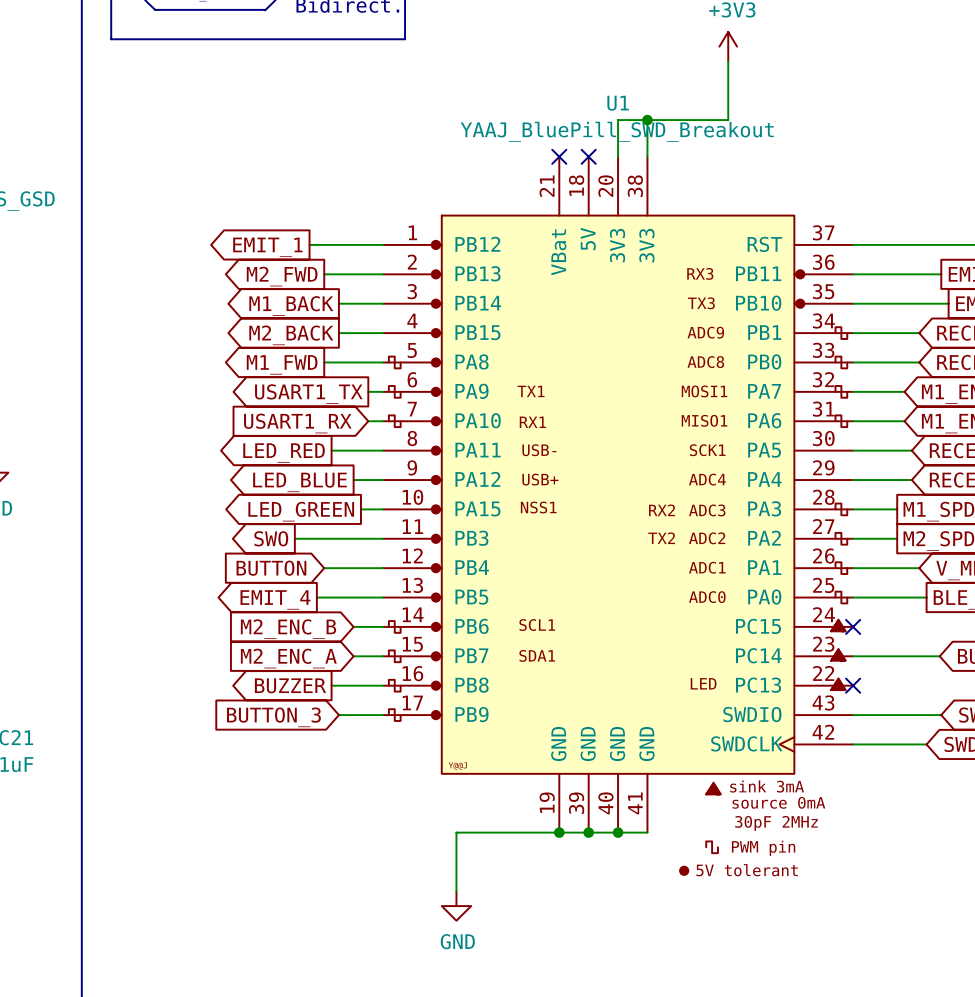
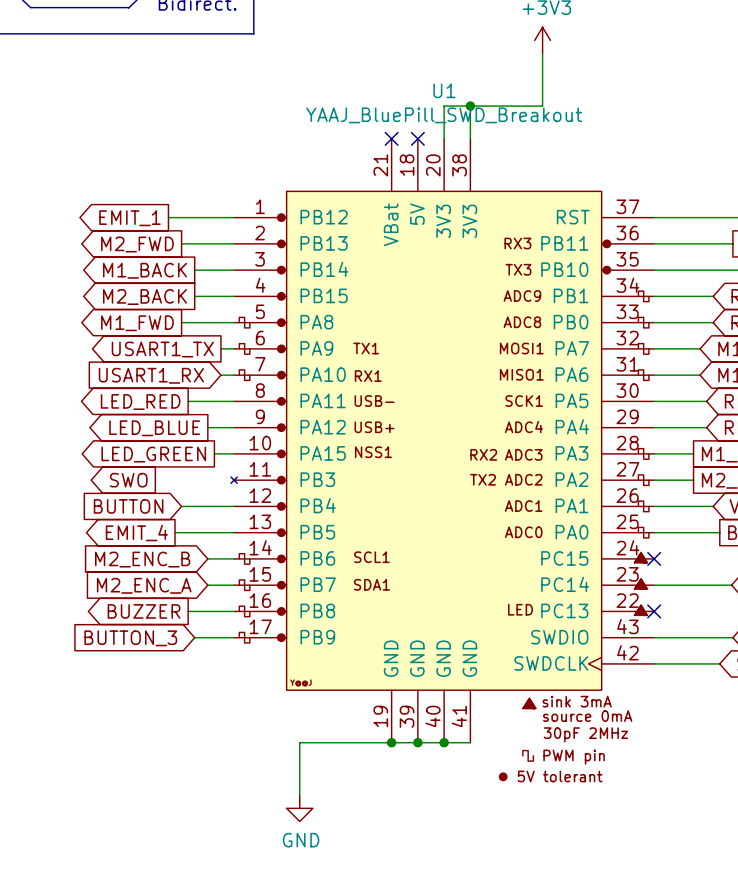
U1 symbol: [383, 156, 854, 875] -> [230, 138, 655, 781]
wire: (294, 538) (383, 538) -> none

